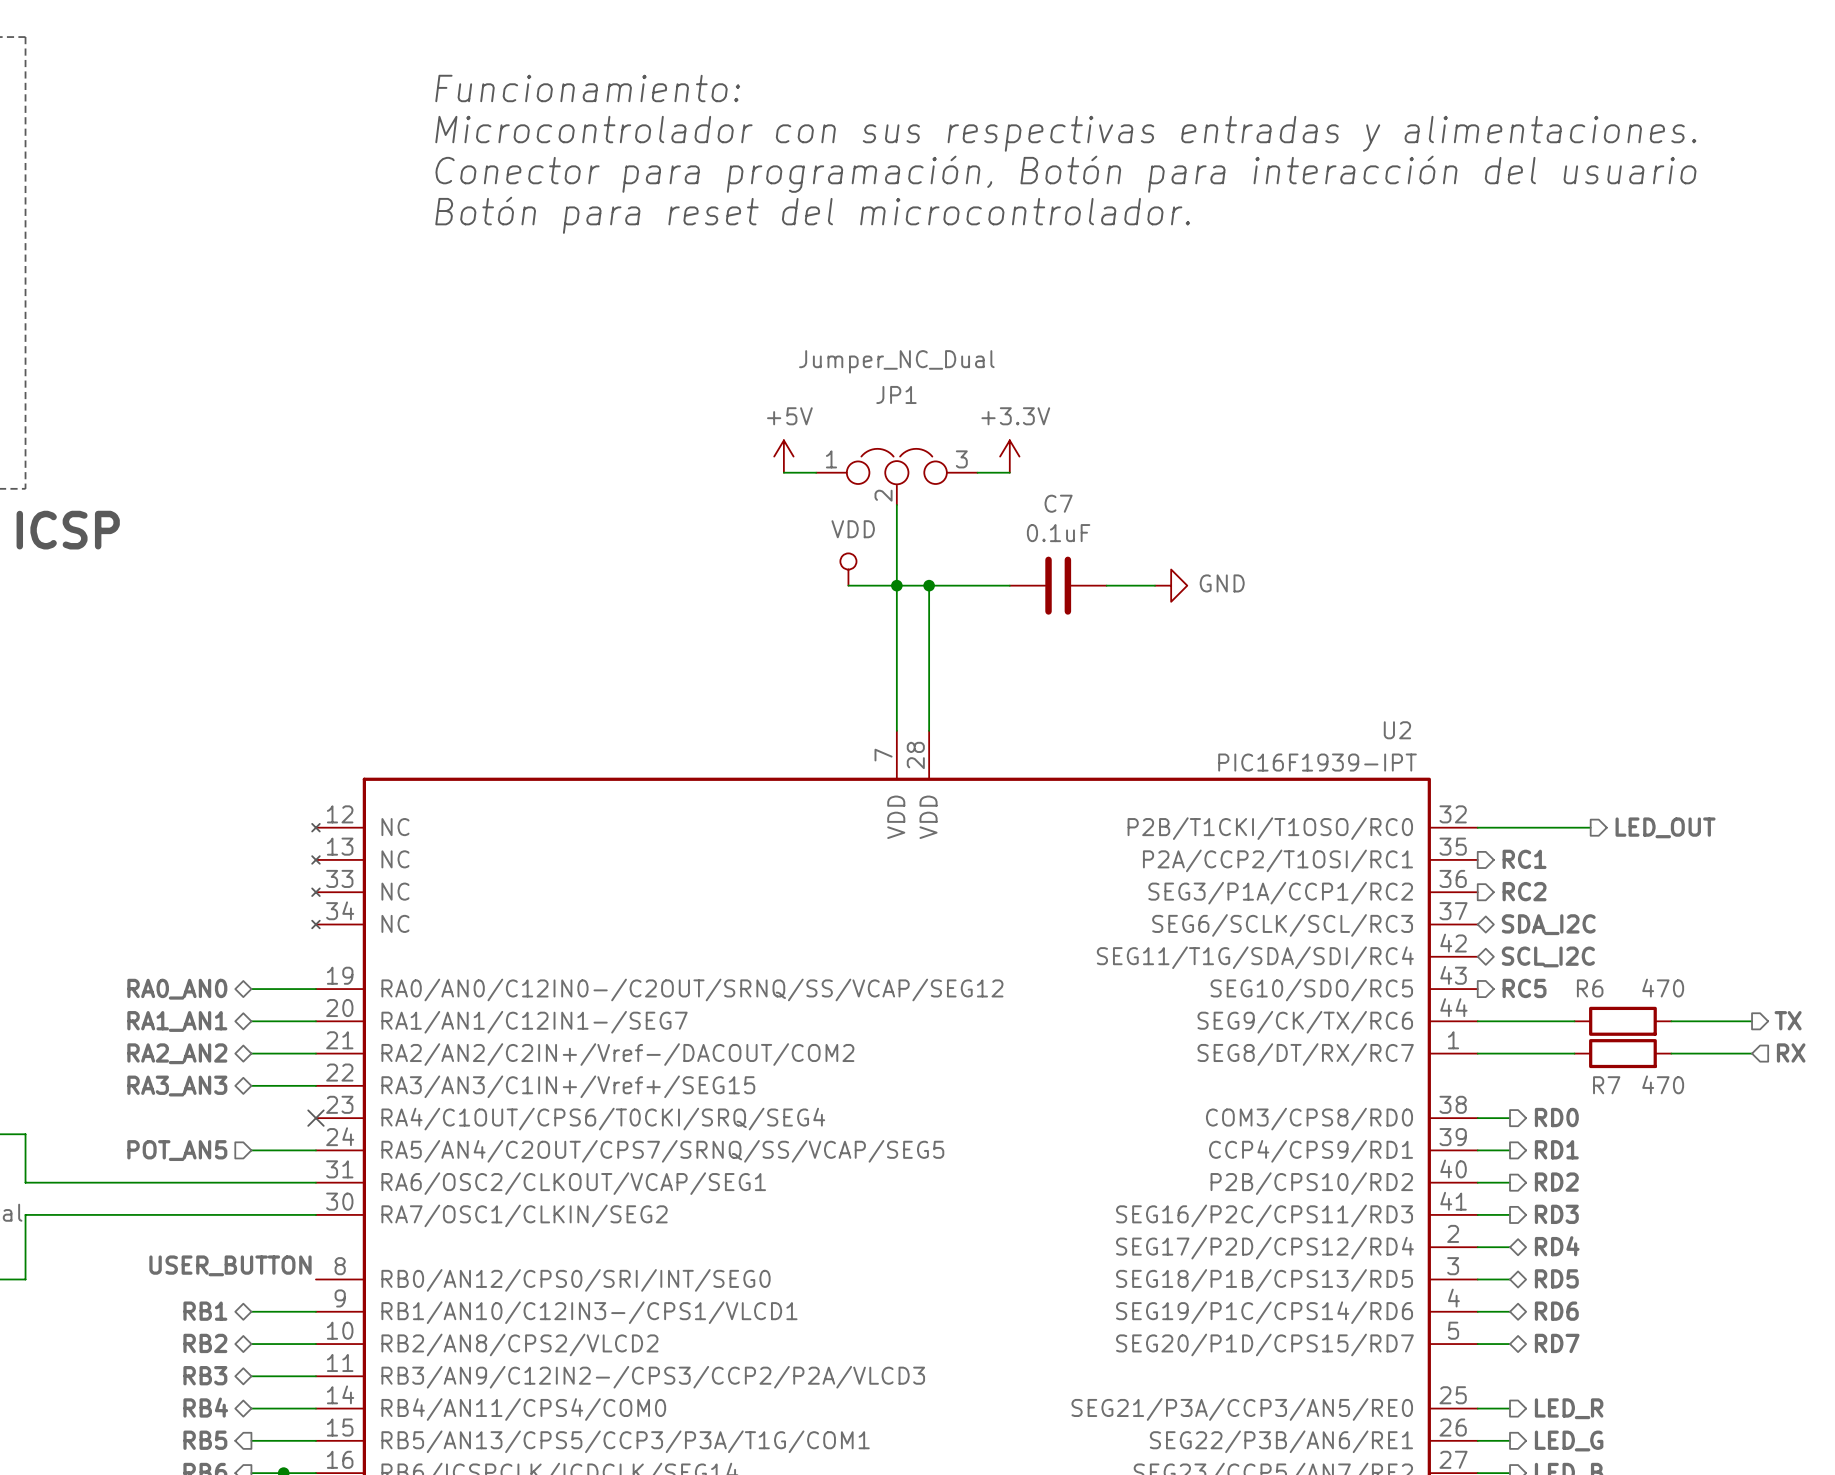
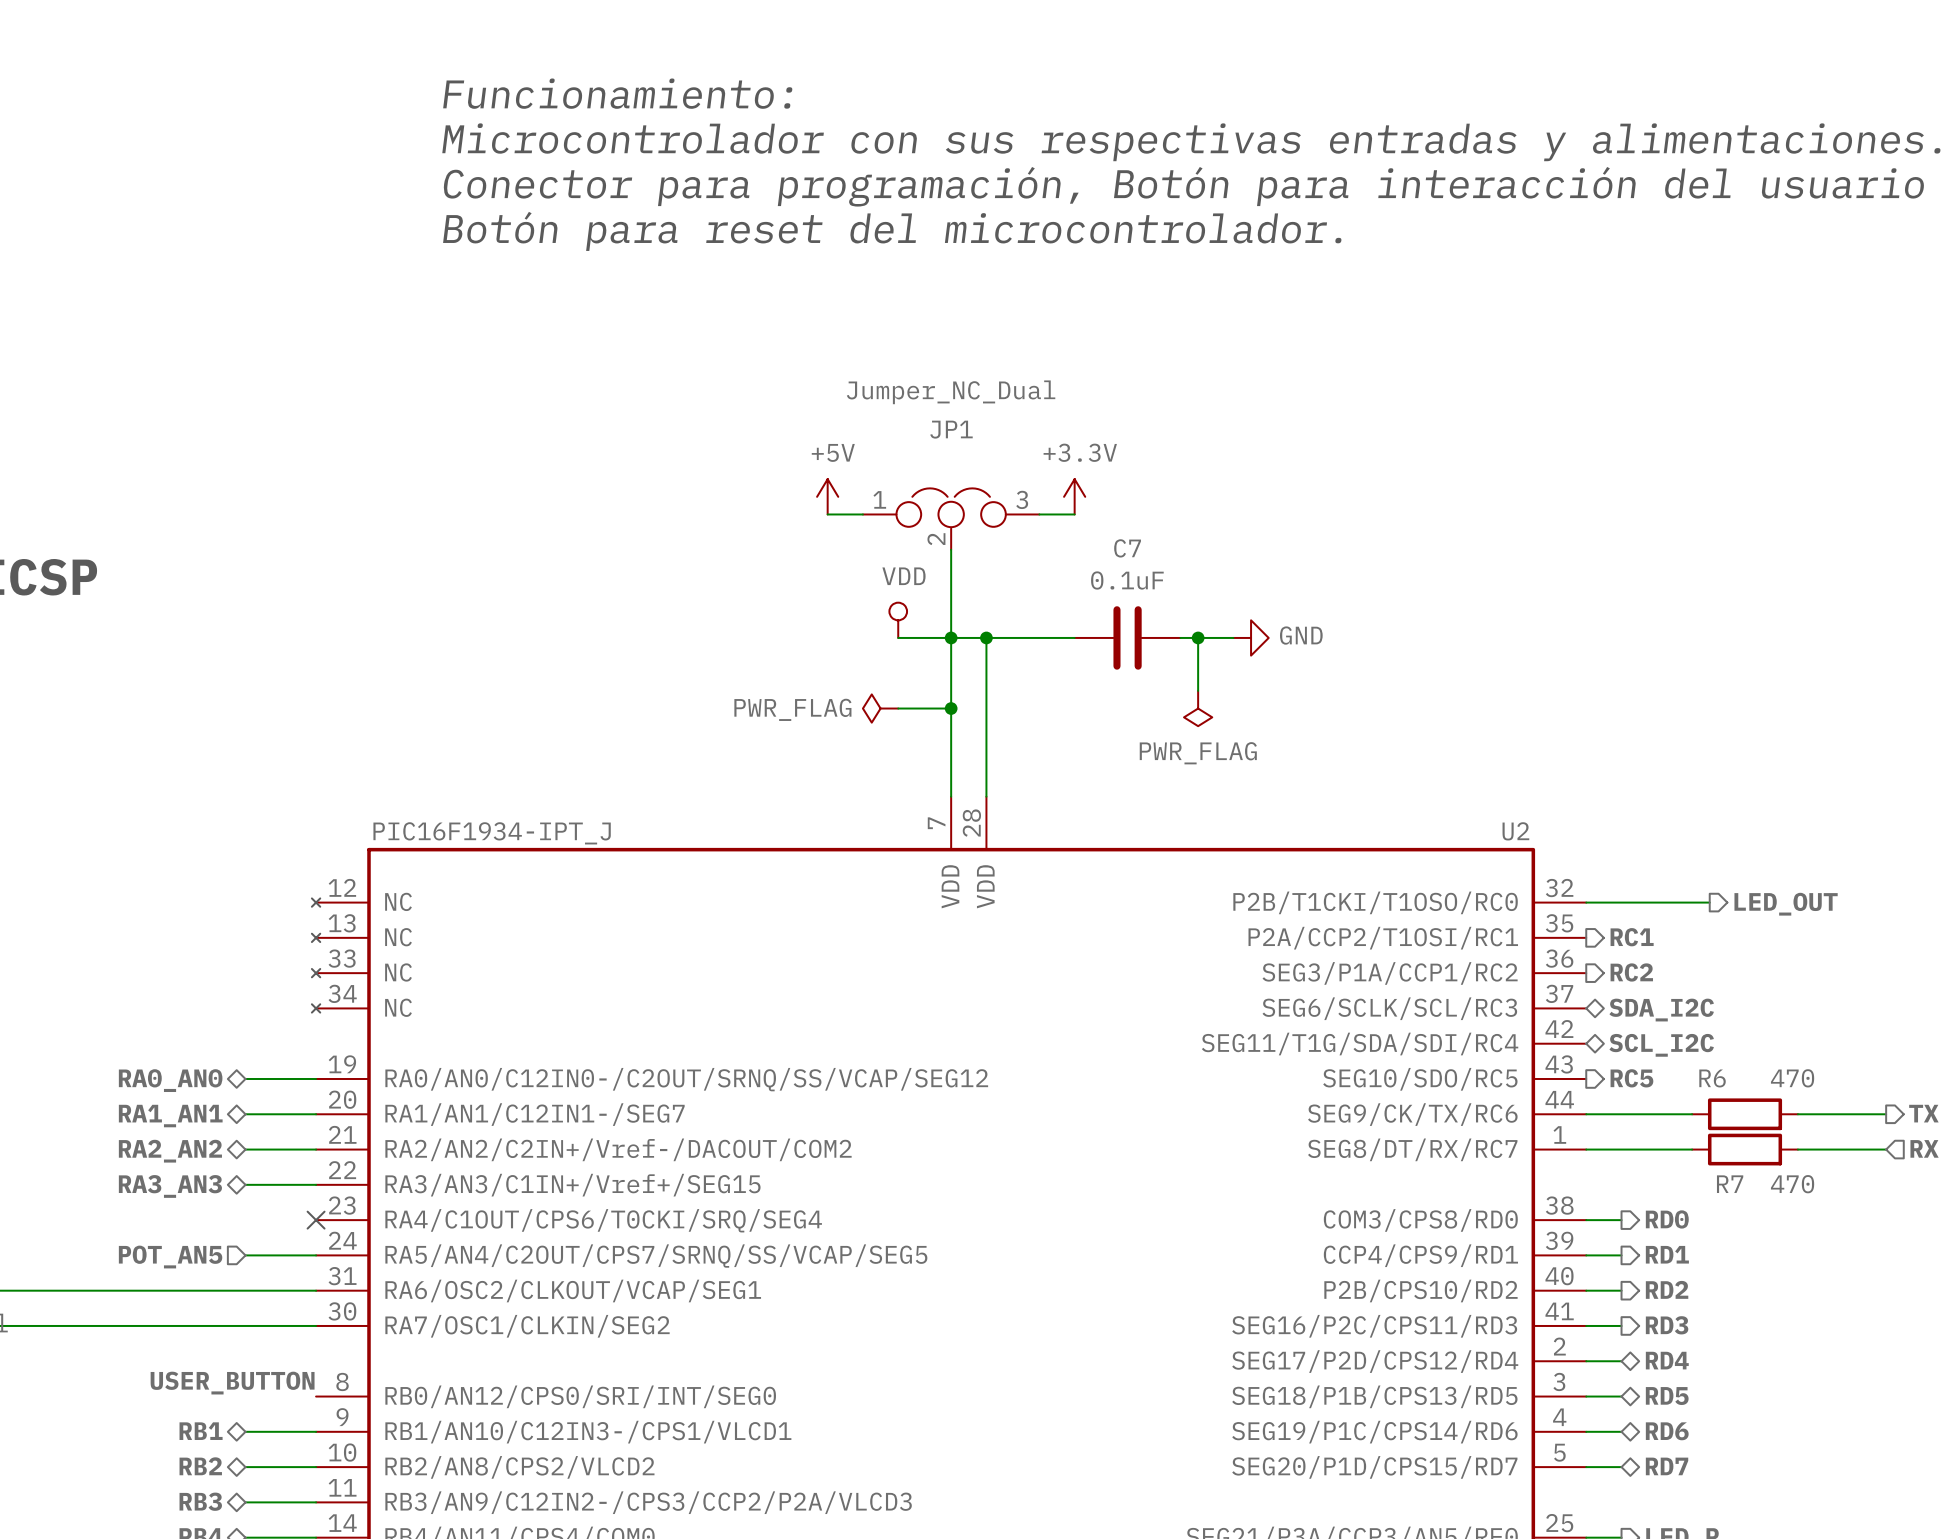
wire: none -> (1198, 637) (1198, 690)
junction: none -> (1198, 637)
power symbol: none -> PWR_FLAG (880, 708)
wire: none -> (898, 708) (951, 708)
junction: none -> (951, 708)
power symbol: none -> PWR_FLAG (1198, 708)
U2 name position: U2 (1397, 730) -> U2 (1515, 831)
U2 value: PIC16F1939-IPT (1317, 762) -> PIC16F1934-IPT_J (492, 833)

